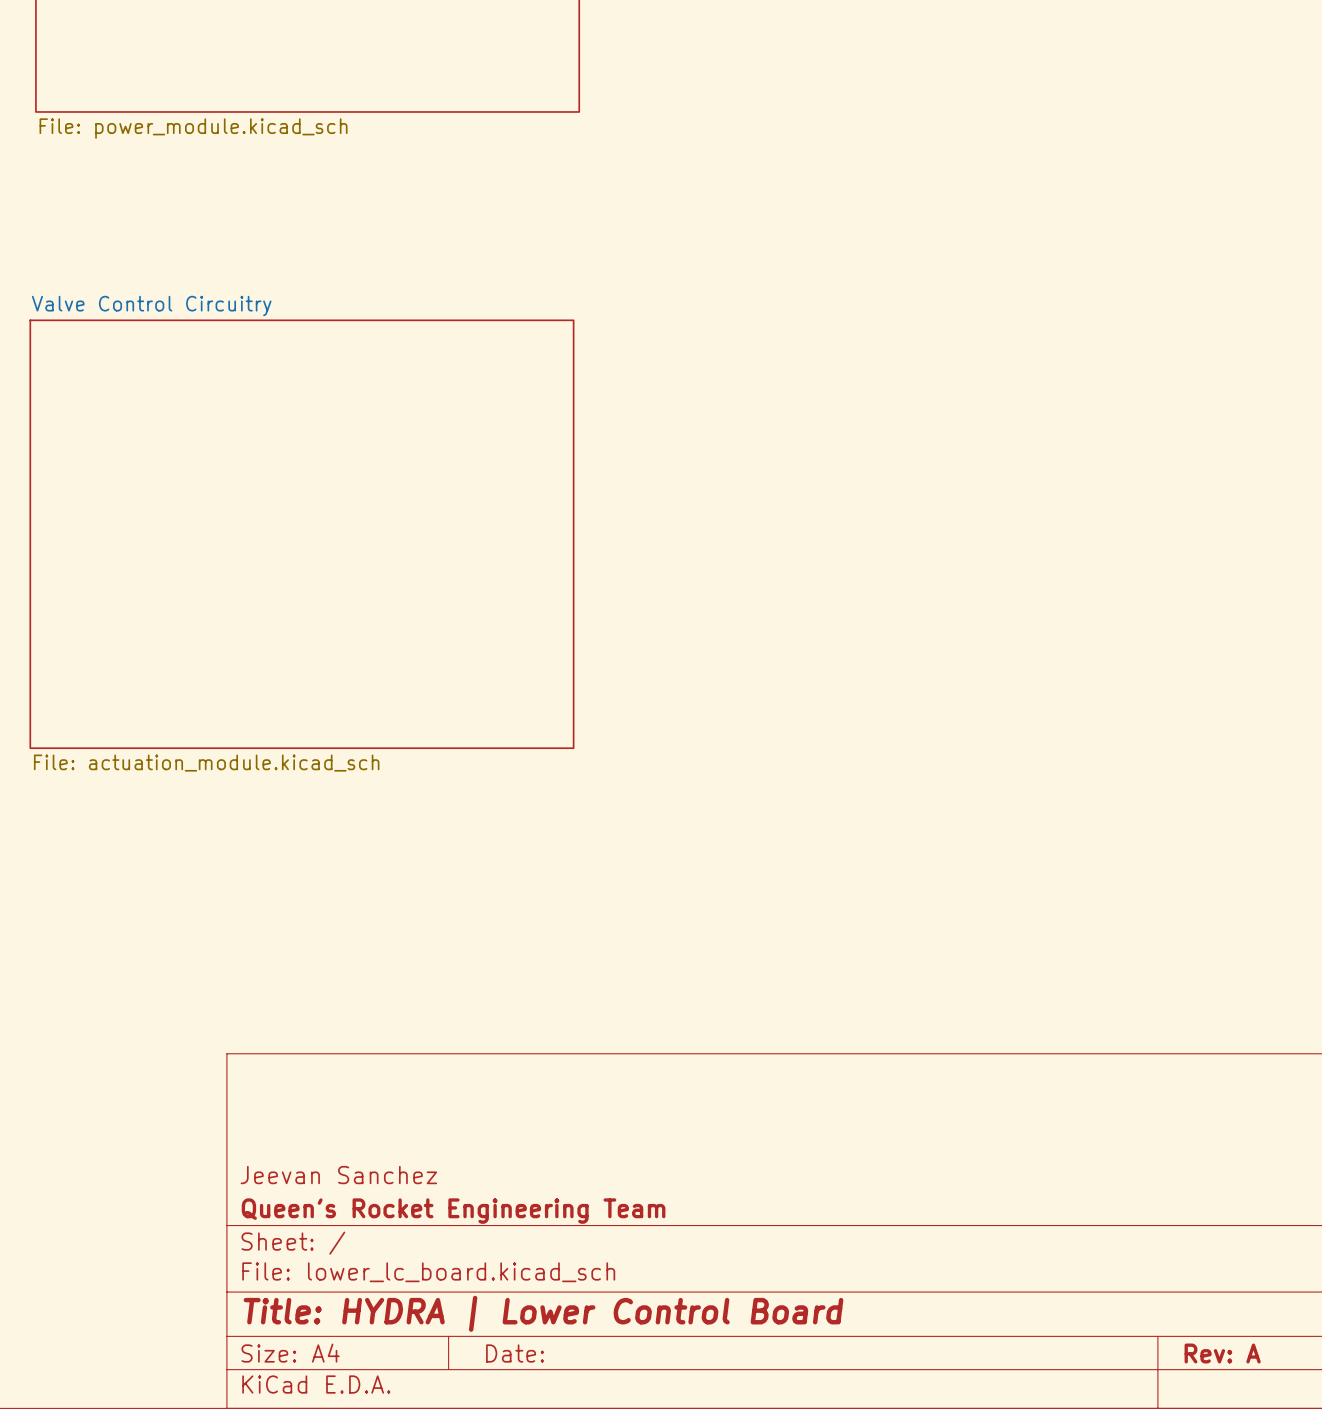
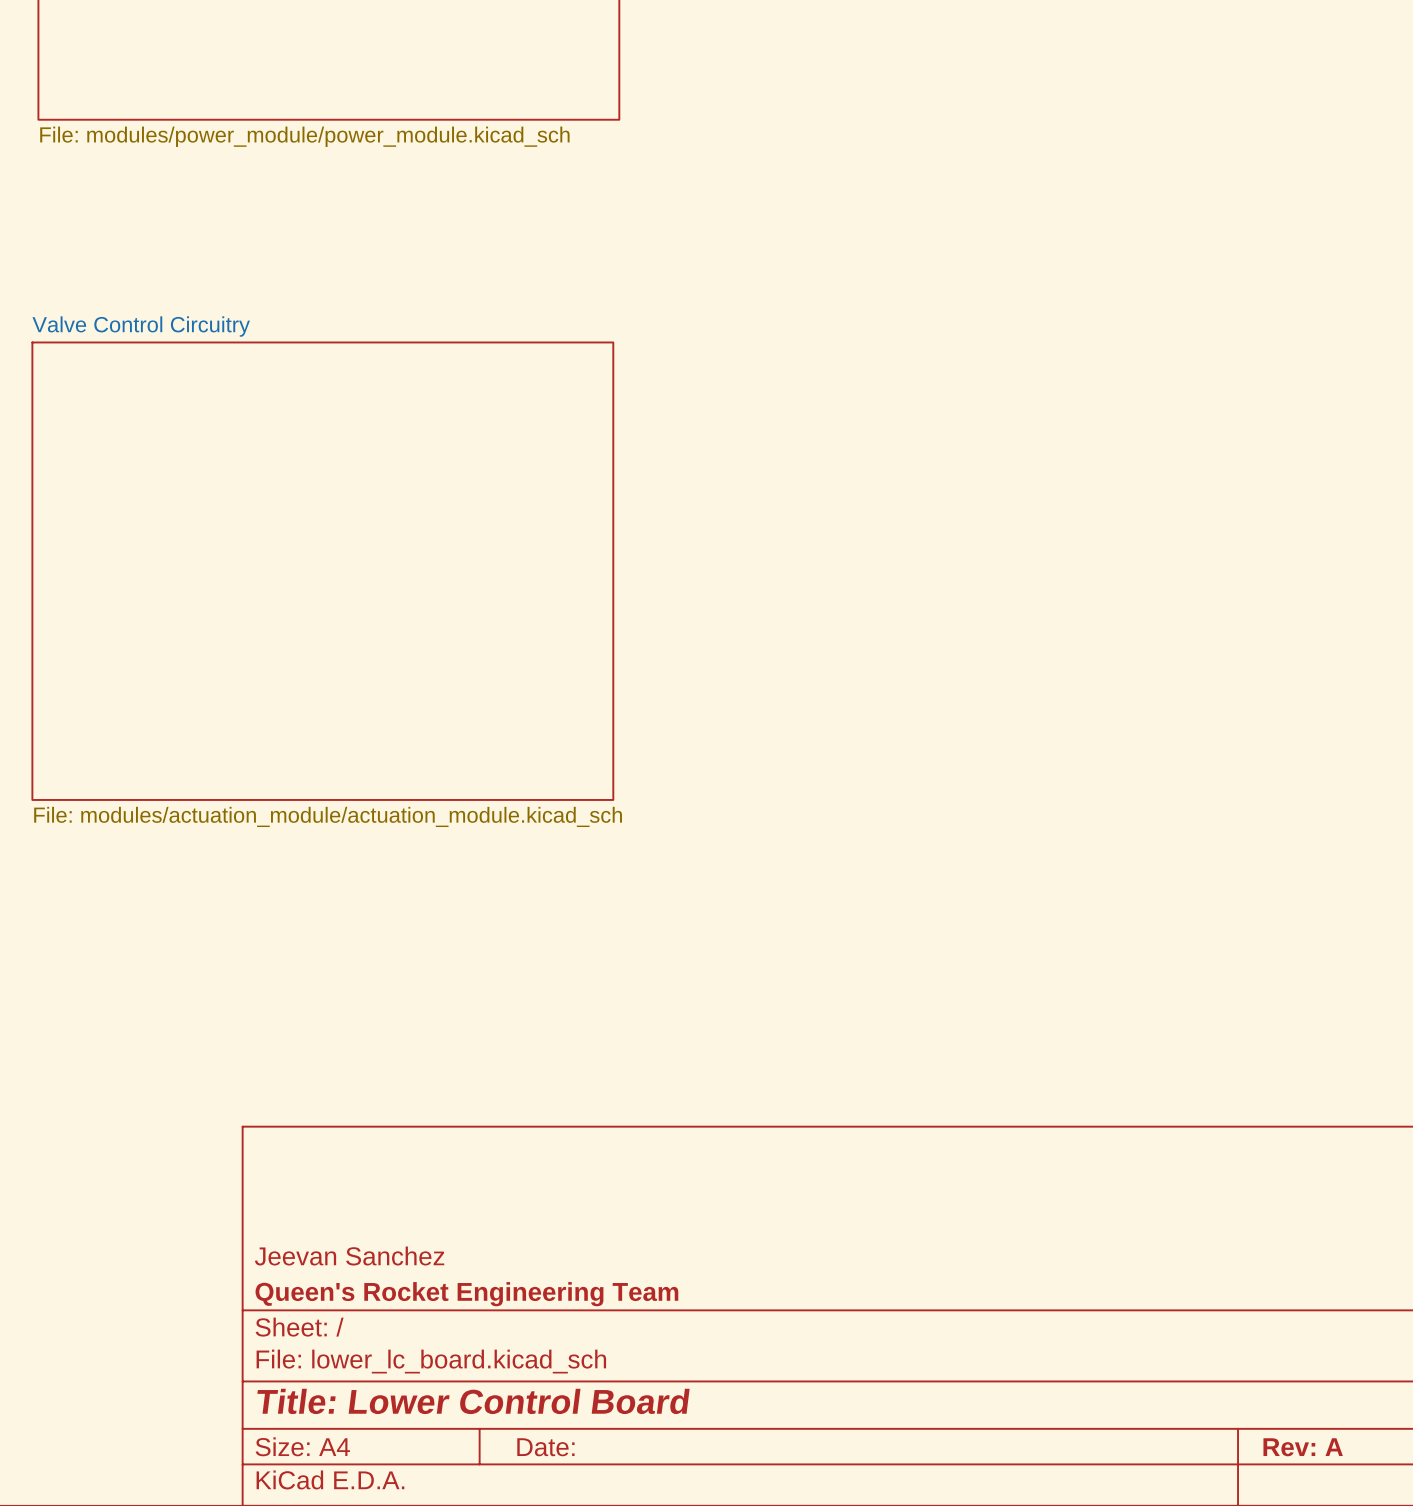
sheet value: File: power_module.kicad_sch (193, 128) -> File: modules/power_module/power_module.kicad_sch (304, 136)
sheet Valve Control Circuitry value: File: actuation_module.kicad_sch (206, 763) -> File: modules/actuation_module/actuation_module.kicad_sch (328, 816)
title block: Title: HYDRA | Lower Control Board (543, 1313) -> Title: Lower Control Board (473, 1401)

